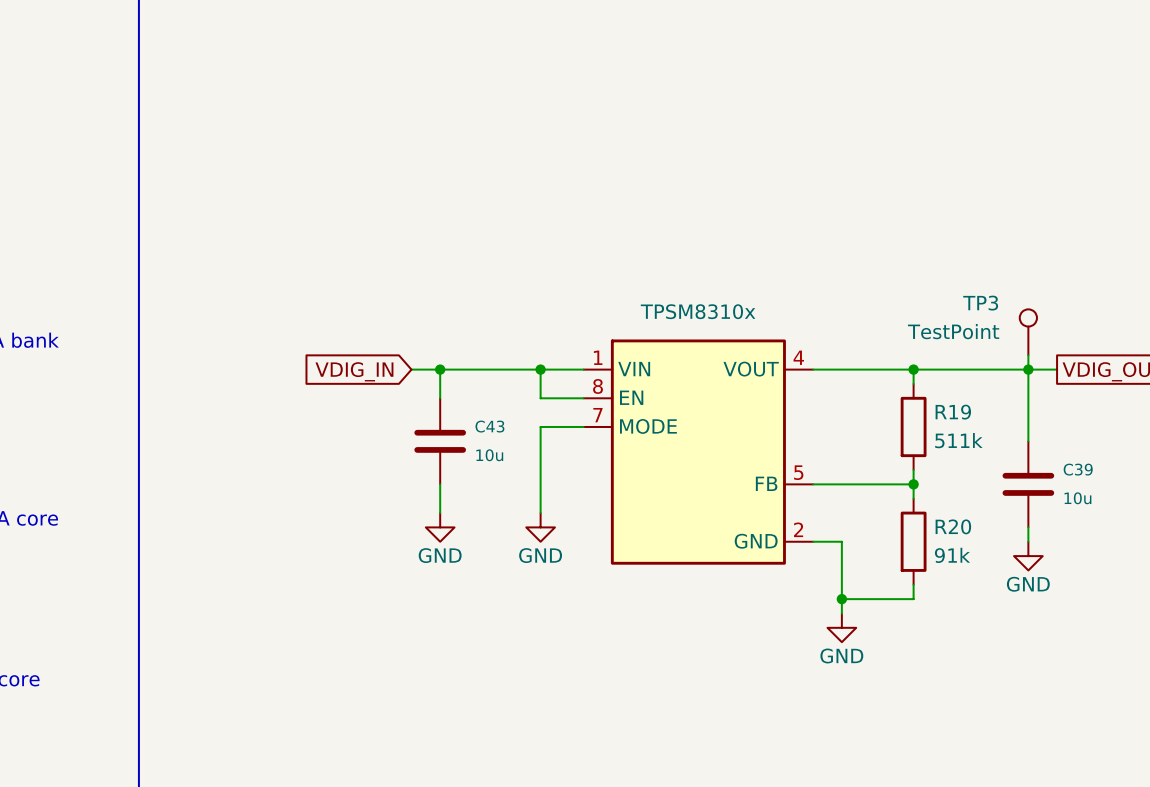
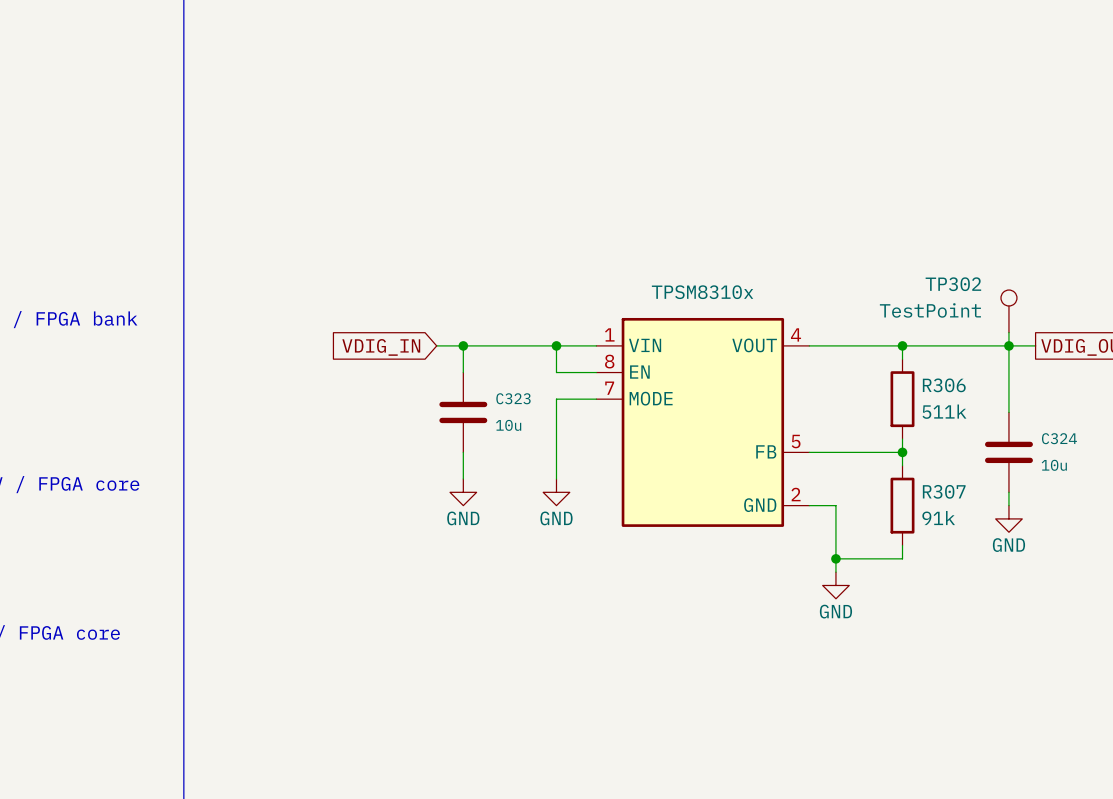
TP3 name: TP3 (980, 303) -> TP302 (953, 284)
R19 name: R19 (953, 412) -> R306 (944, 385)
C43 name: C43 (489, 426) -> C323 (513, 398)
C39 name: C39 (1078, 469) -> C324 (1059, 438)
R20 name: R20 (953, 526) -> R307 (944, 491)

